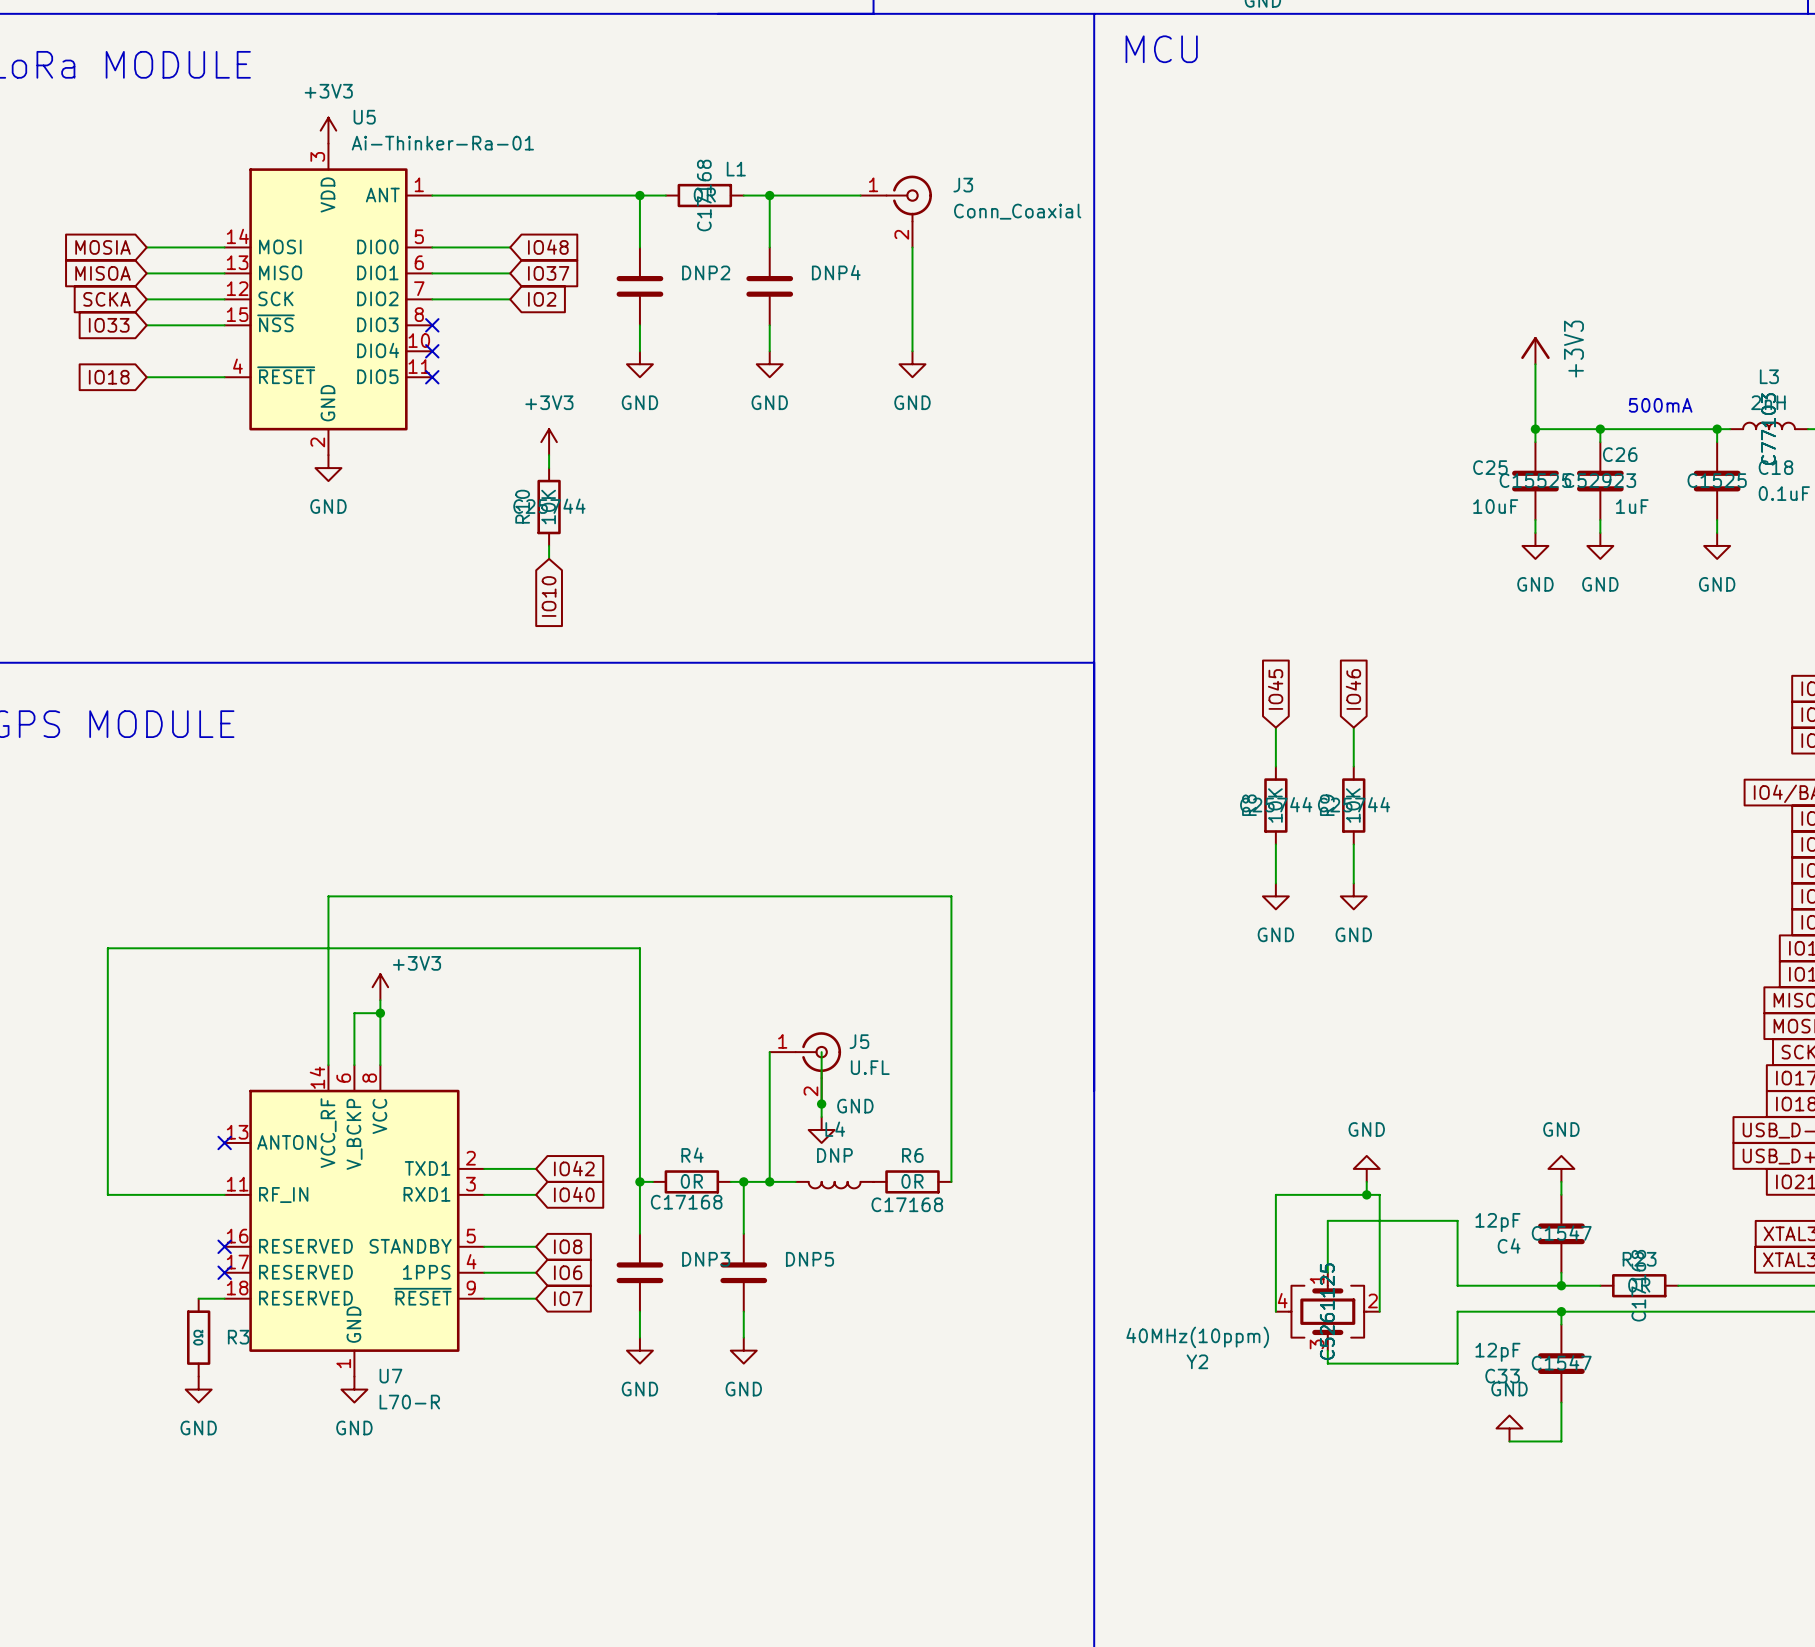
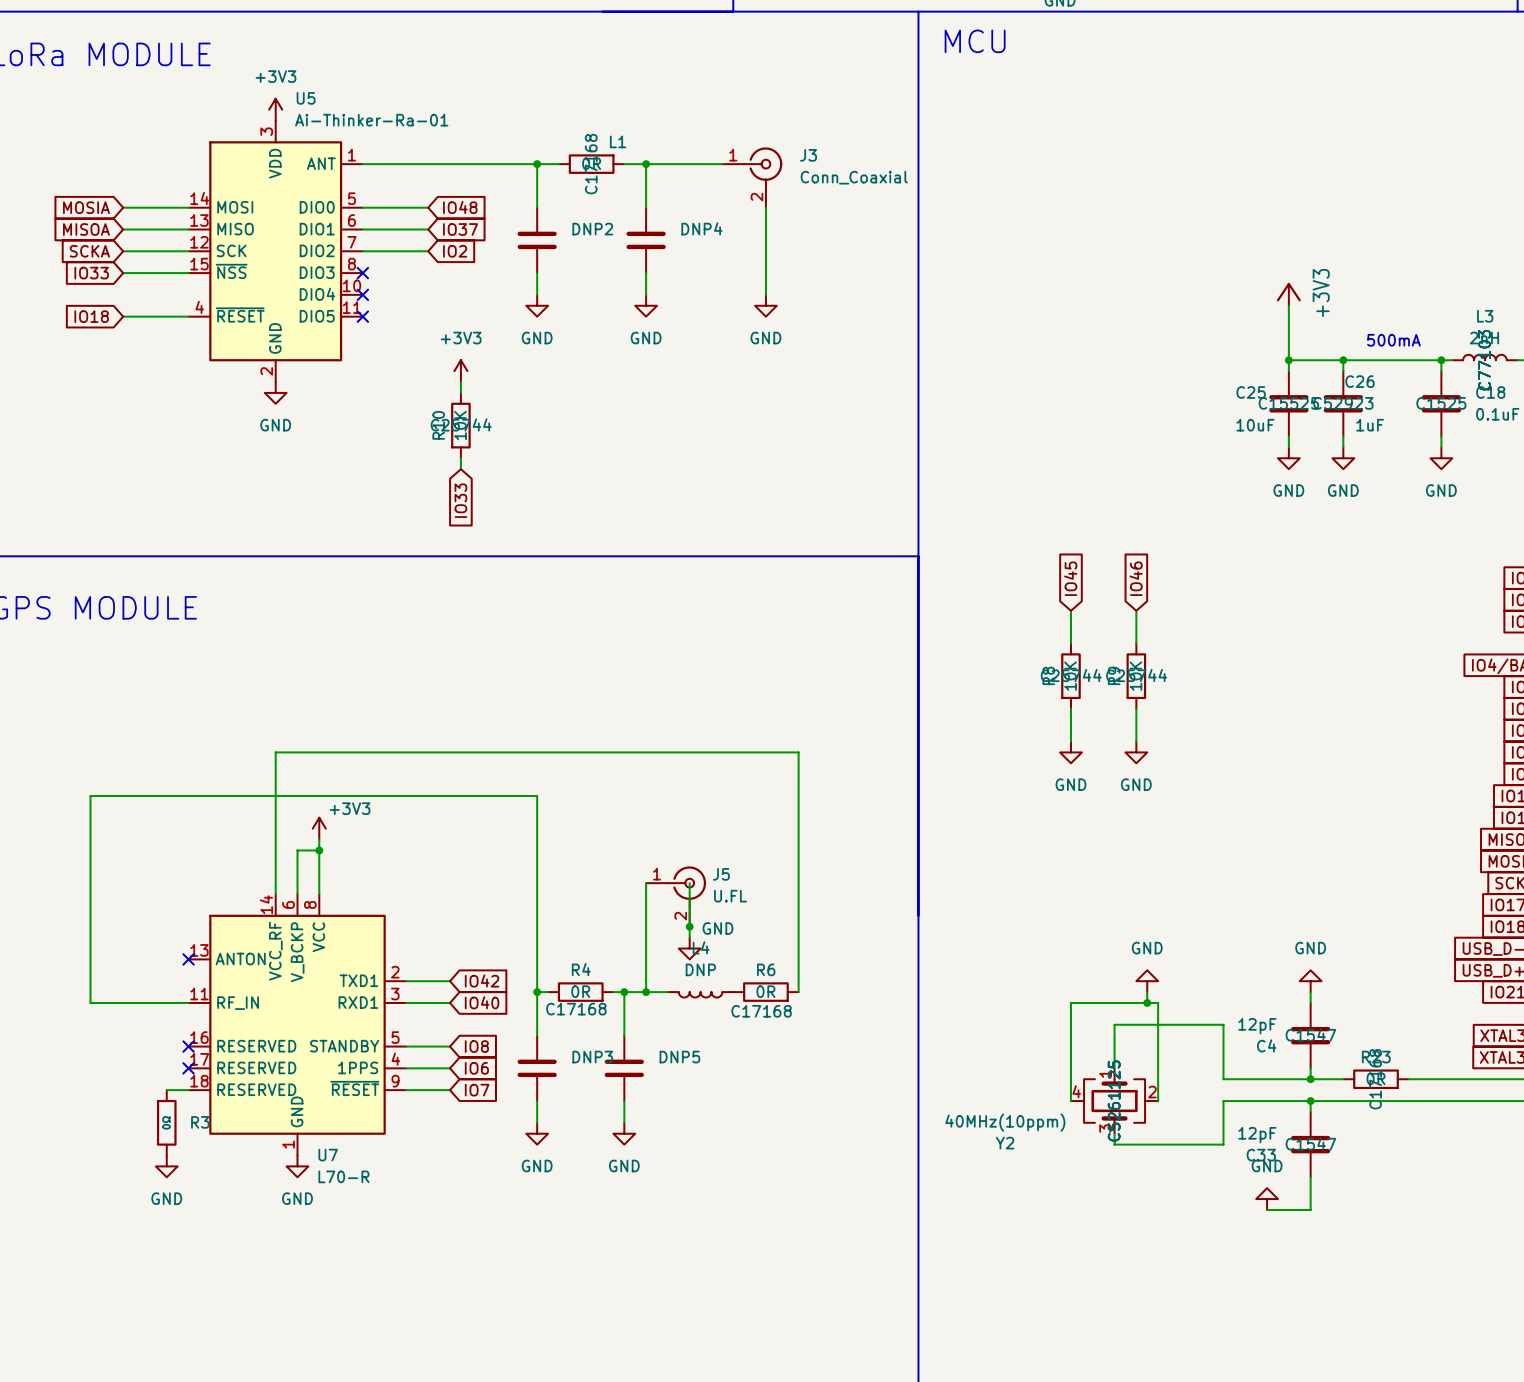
global label: IO10 (549, 596) -> IO33 (460, 500)

